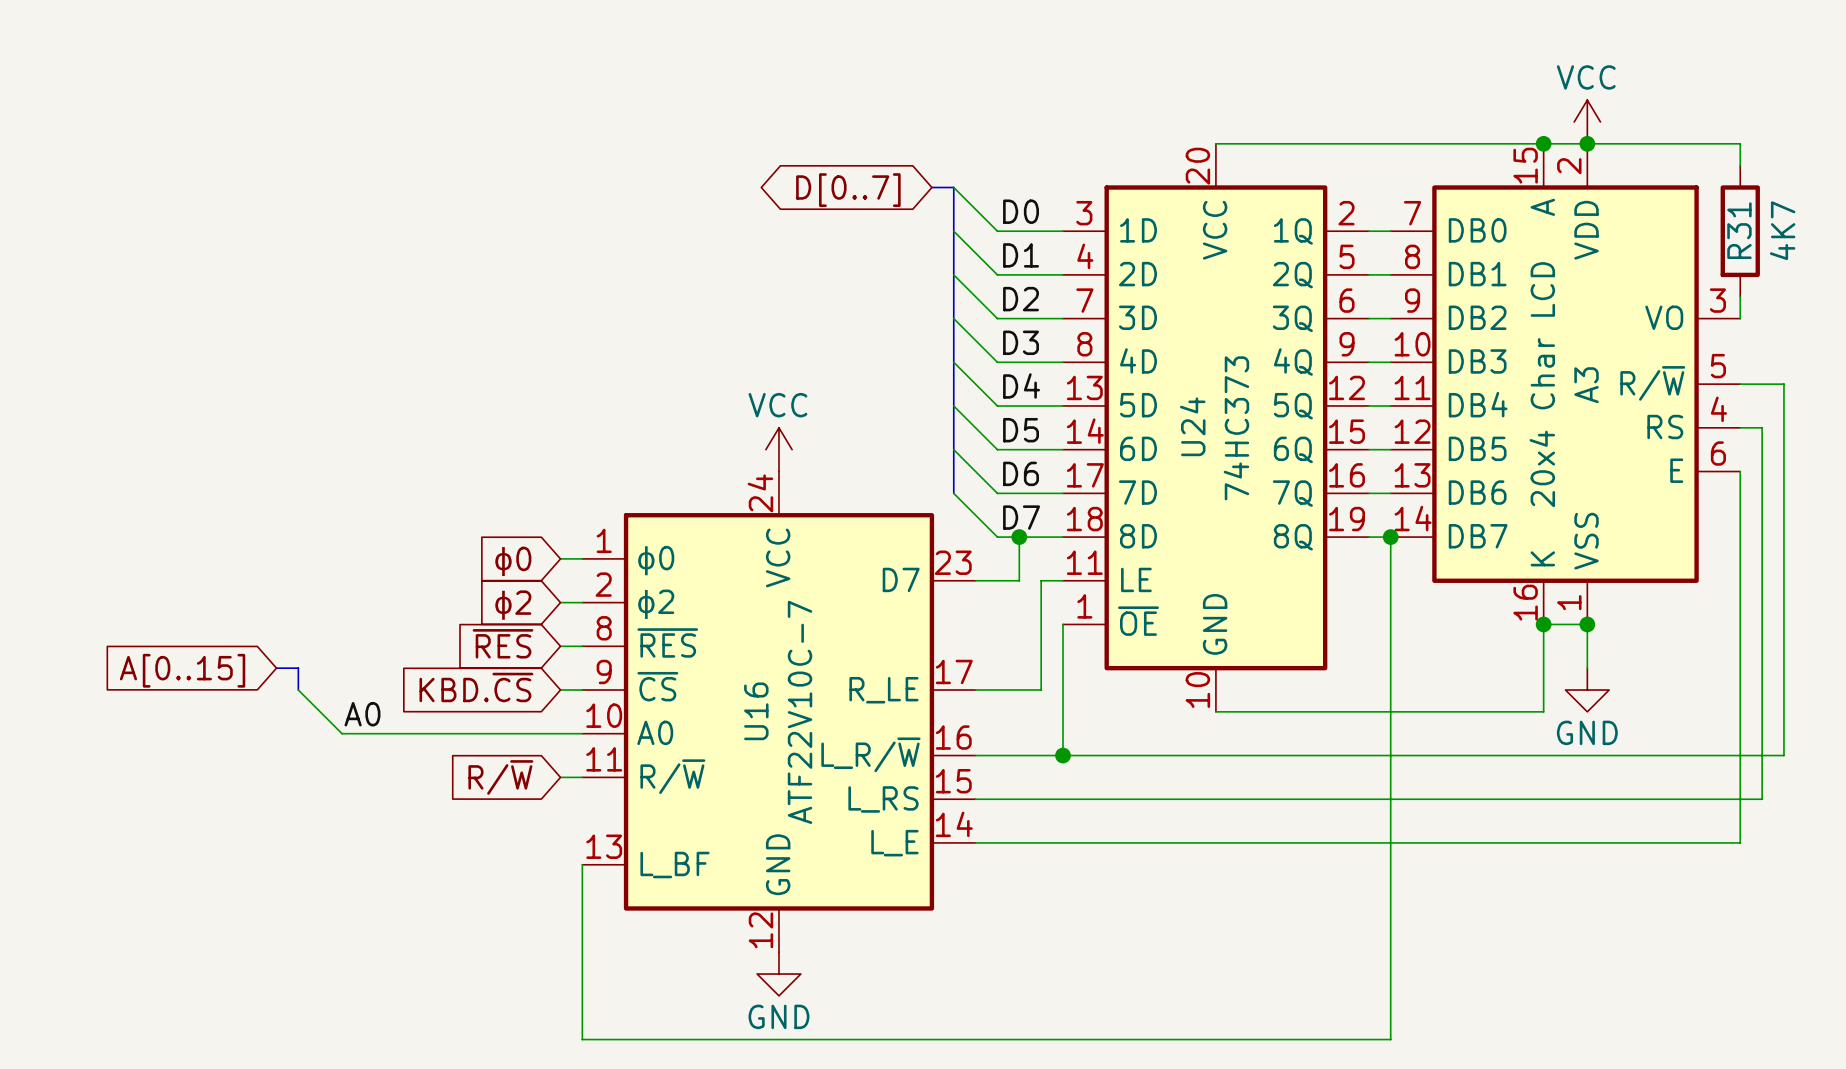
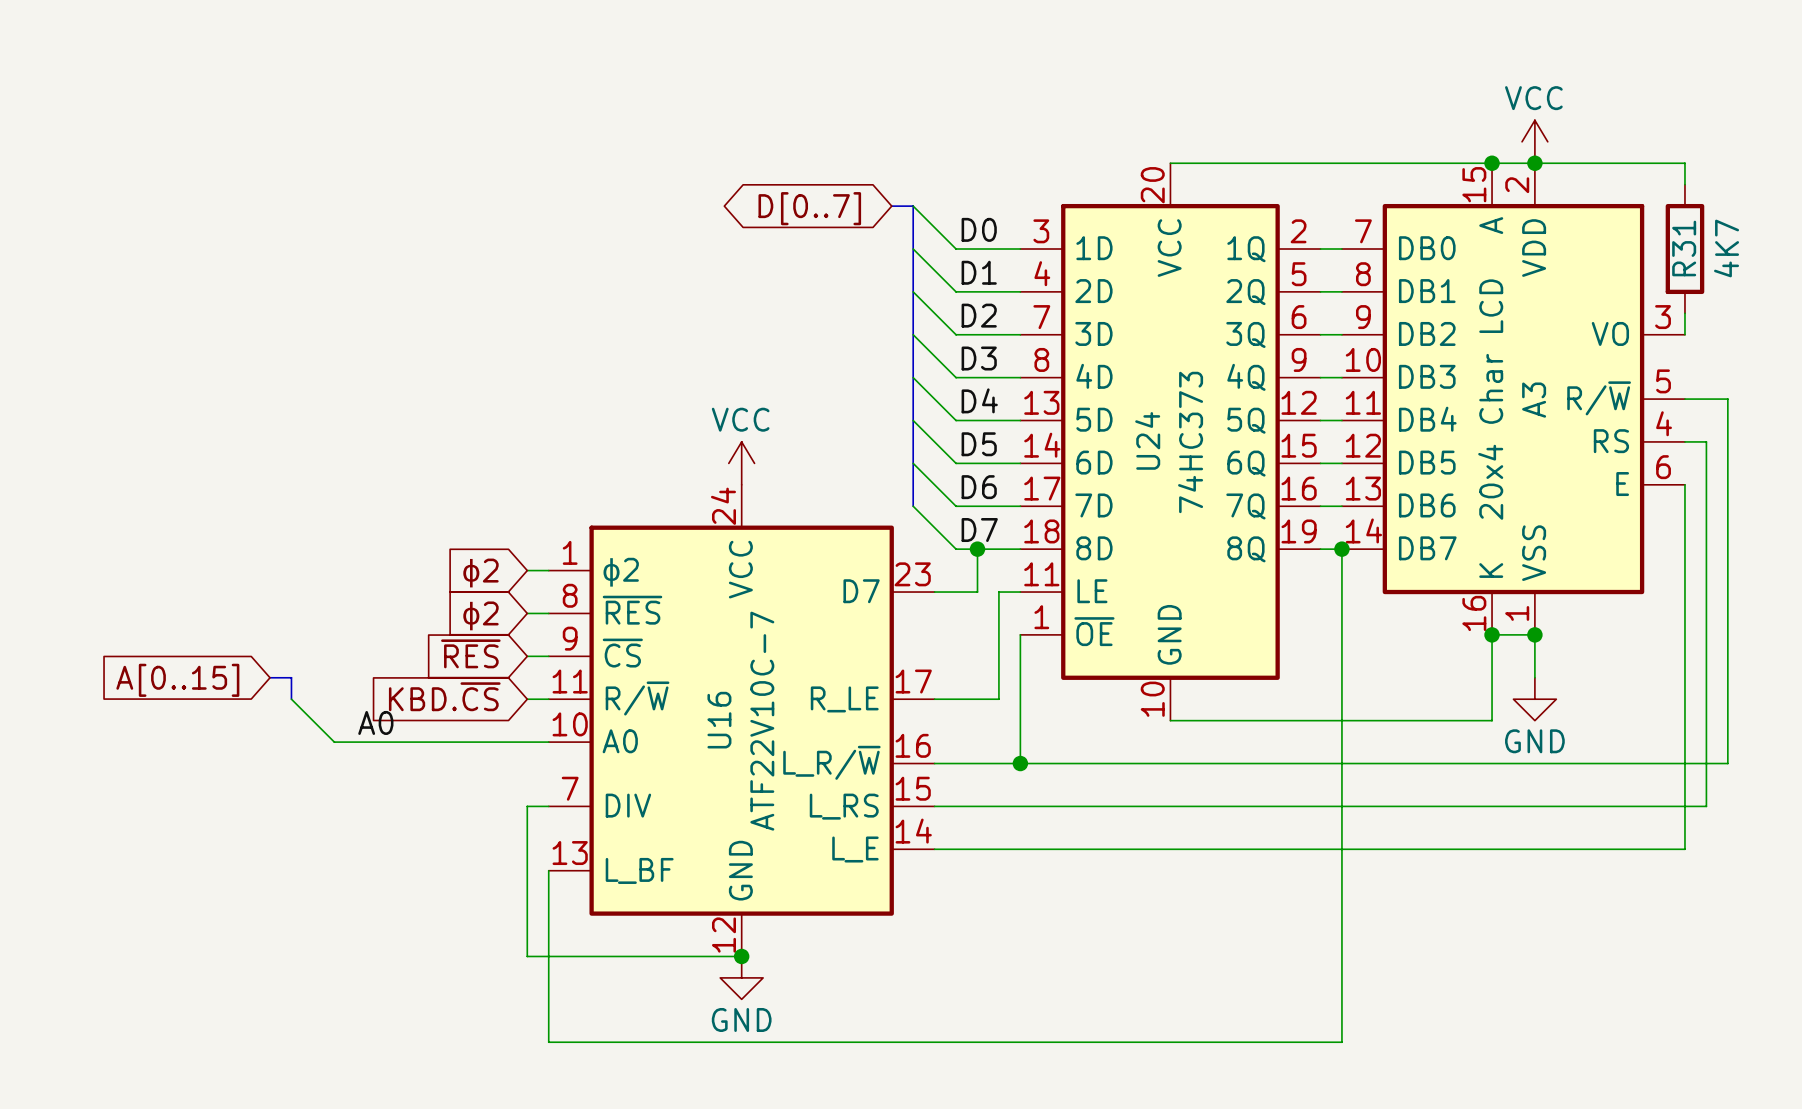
U16 symbol: [582, 471, 976, 953] -> [548, 484, 935, 957]
global label: ϕ0 (512, 561) -> ϕ2 (480, 573)
bus: (276, 668) (298, 668) (298, 690) -> (270, 677) (291, 677) (291, 699)
global label position: A[0..15] (182, 670) -> A[0..15] (177, 680)
wire: (298, 690) (342, 733) (363, 733) -> (291, 699) (334, 742)
label position: A0 (362, 714) -> A0 (375, 722)
global label: R/~{W} (500, 777) -> none
wire: (560, 777) (582, 777) -> none
wire: none -> (548, 806) (527, 806) (527, 956) (741, 956)
junction: none -> (741, 956)

